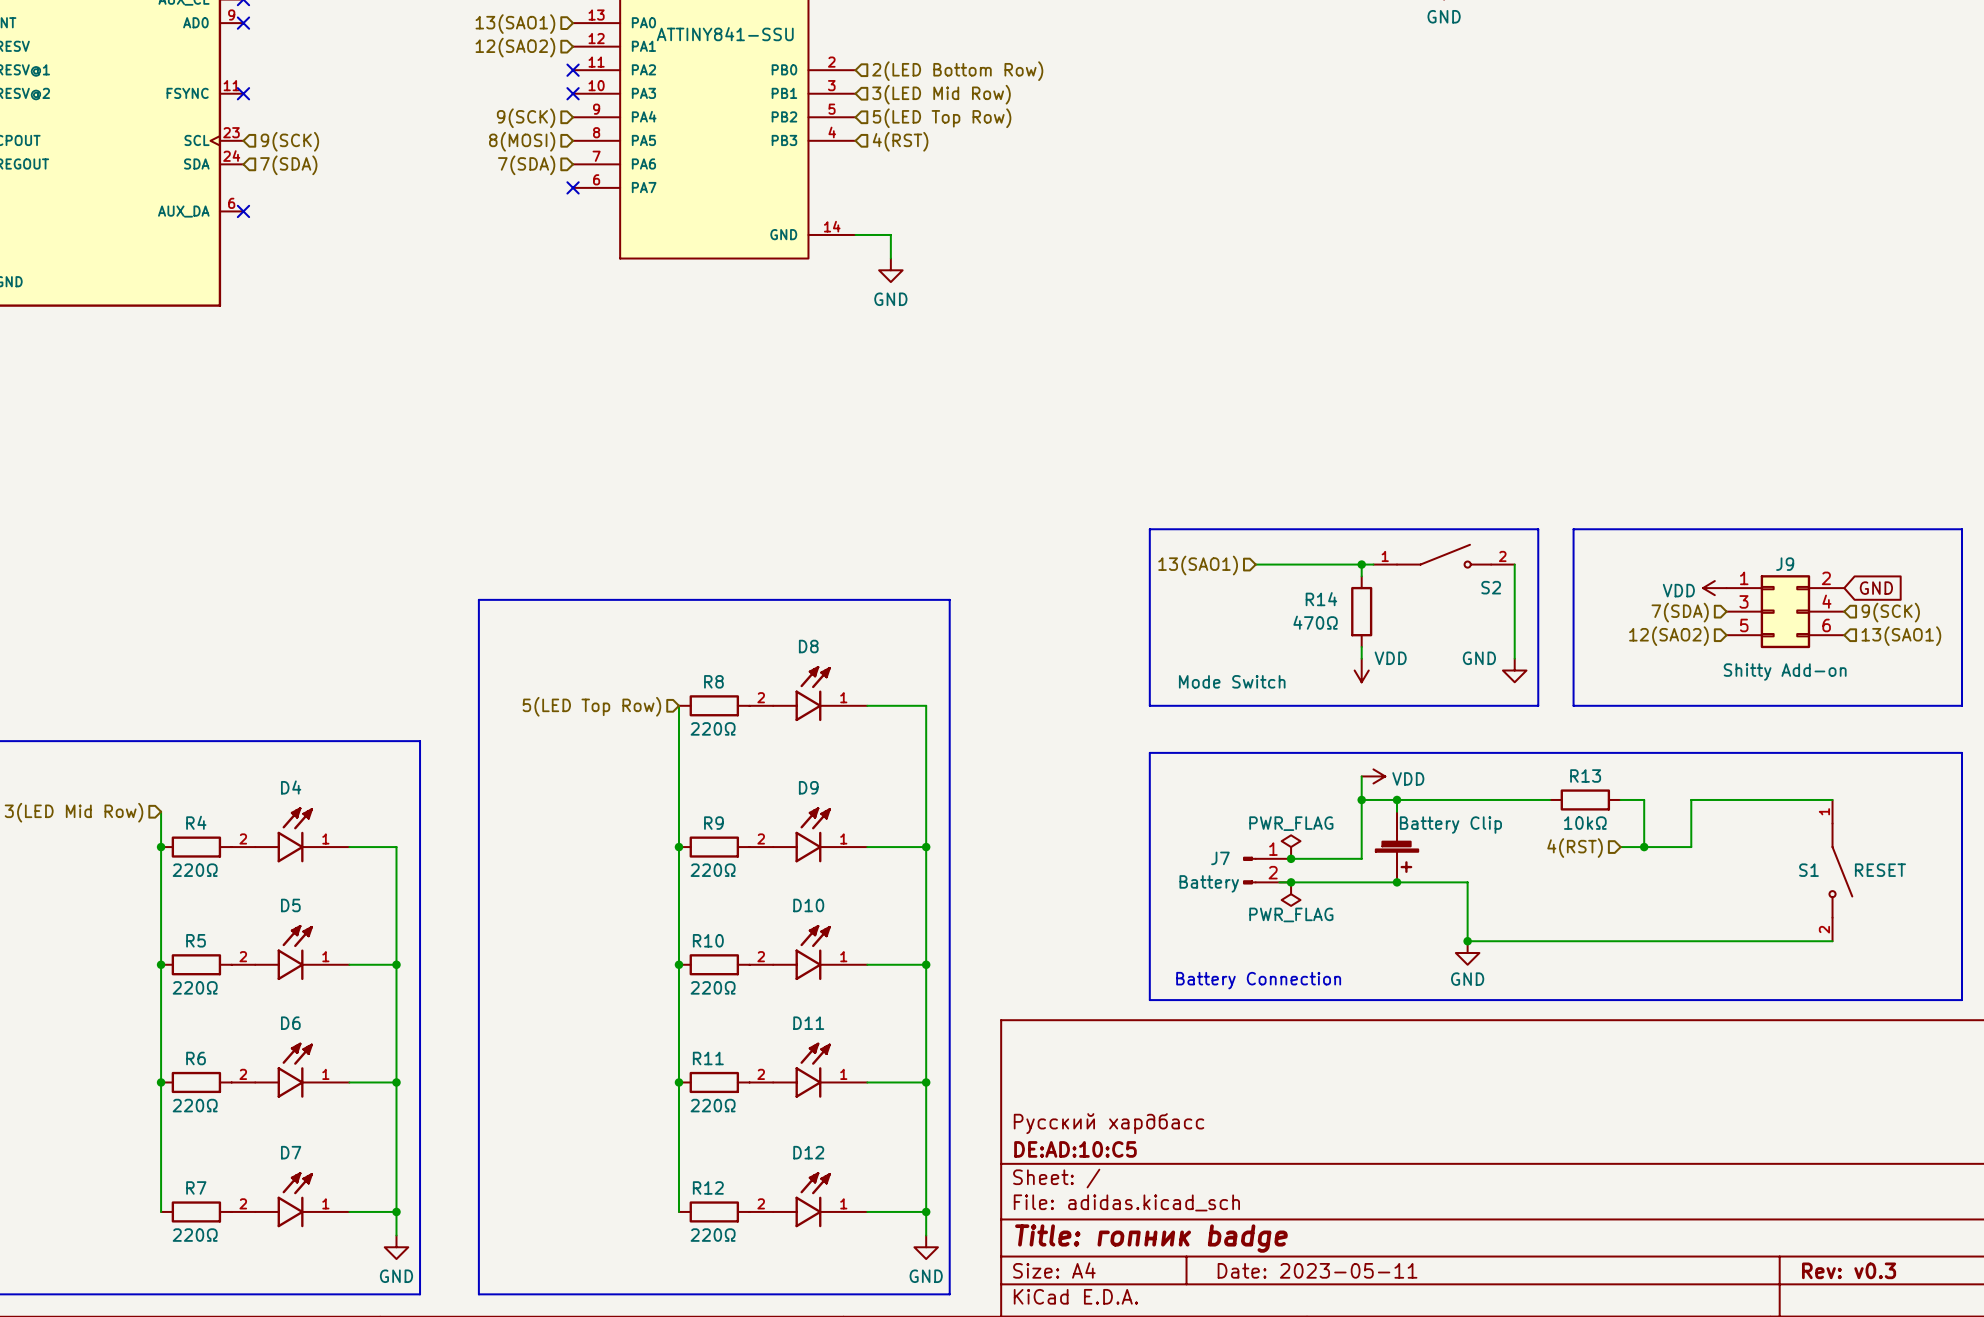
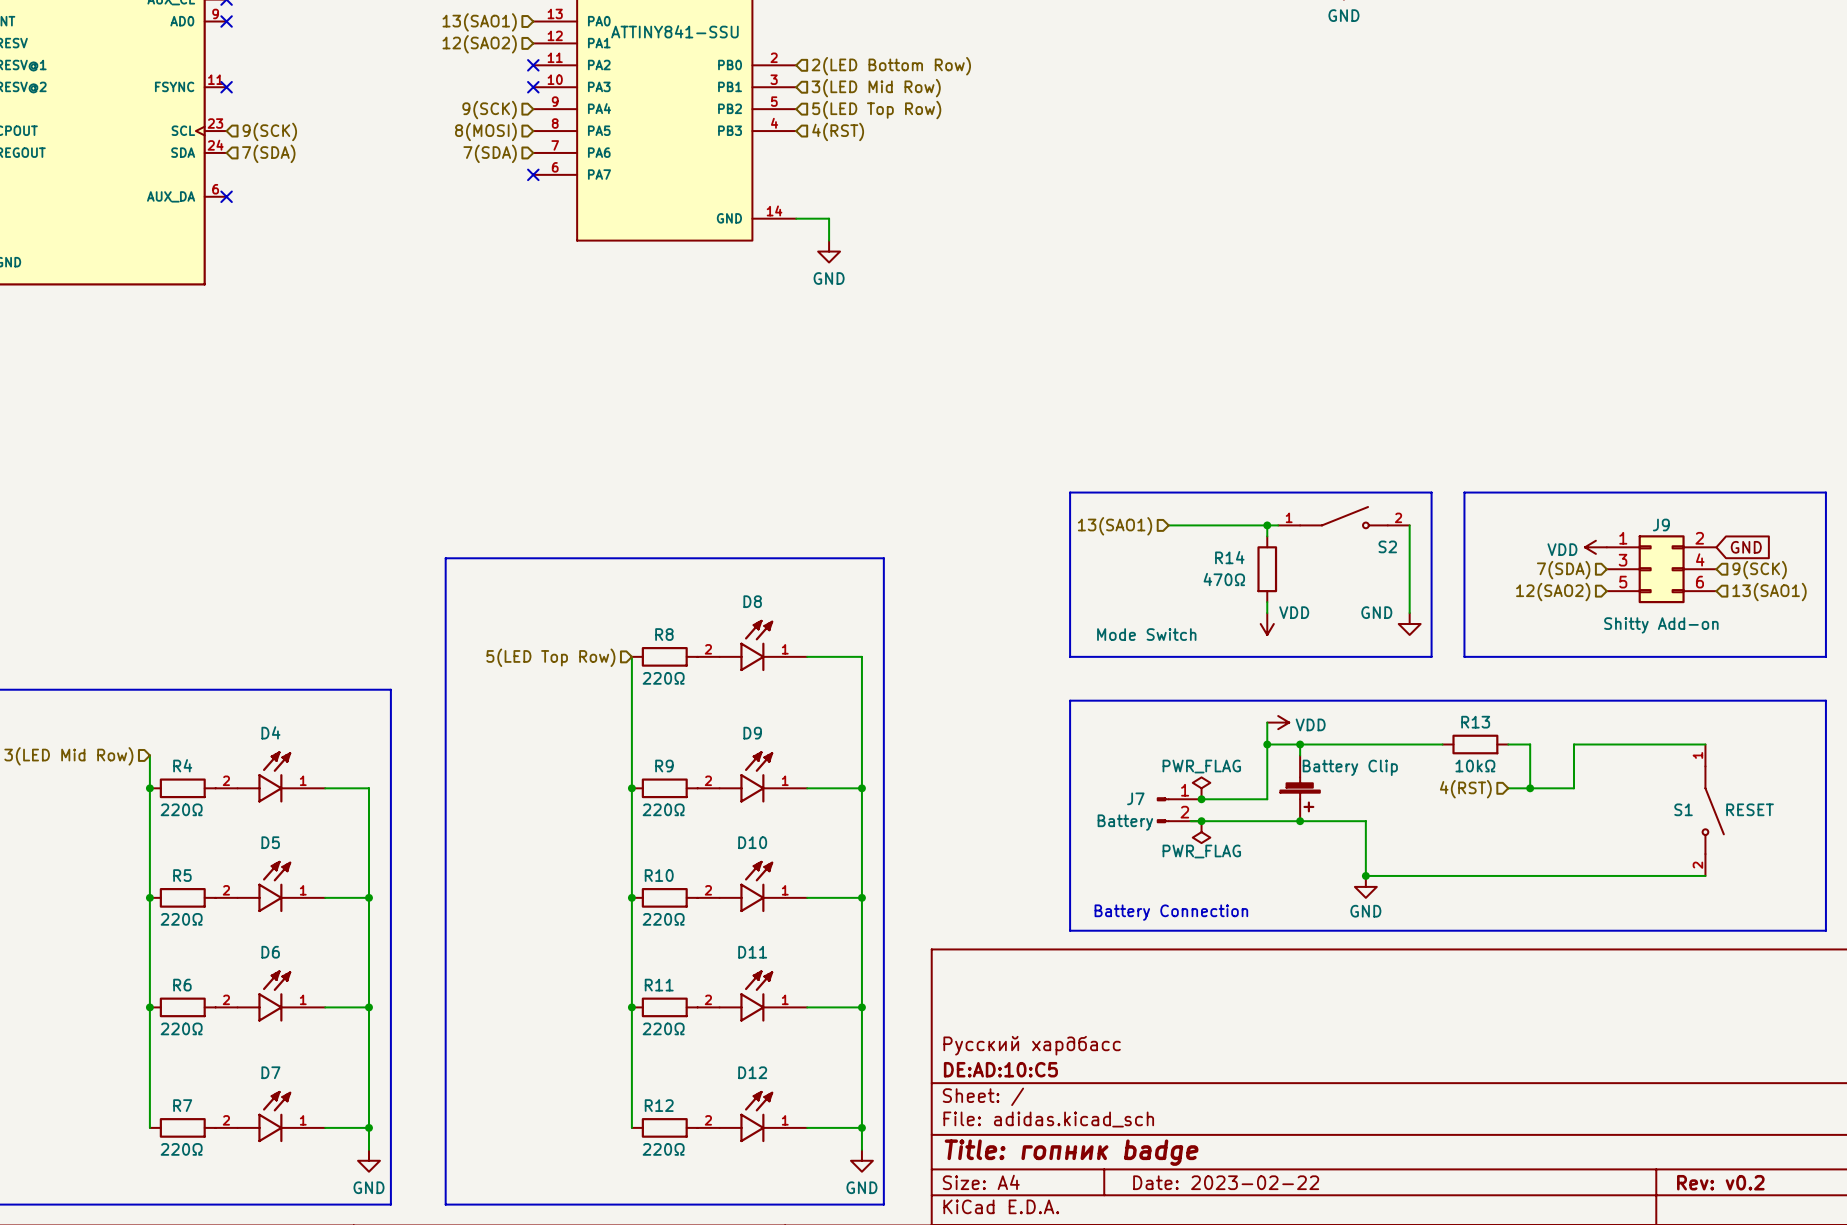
title block: Date: 2023-05-11 (1317, 1270) -> Date: 2023-02-22 (1226, 1182)
title block: Rev: v0.3 (1849, 1270) -> Rev: v0.2 (1720, 1182)

